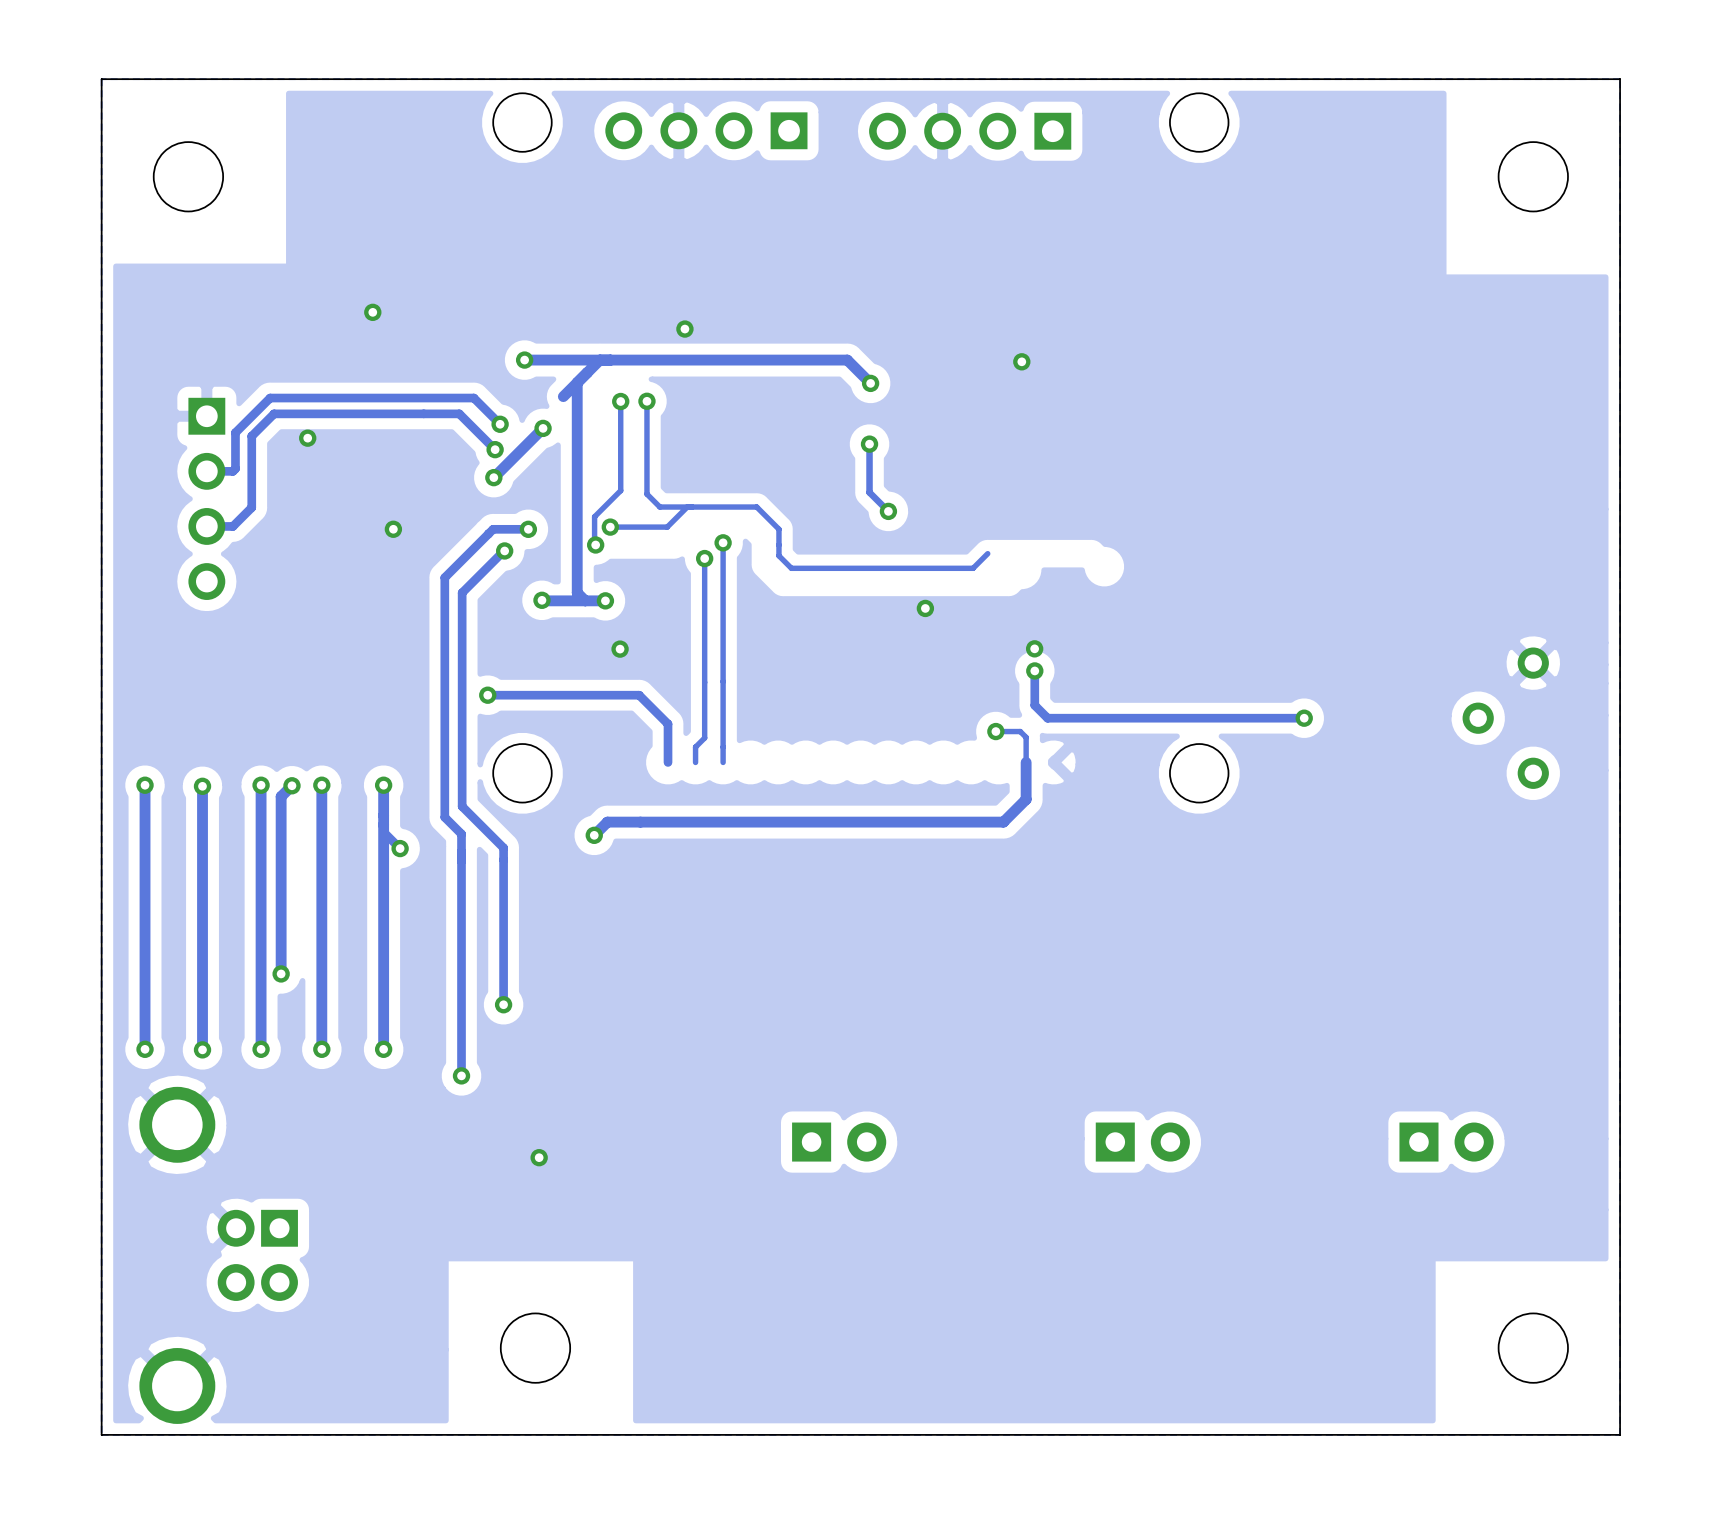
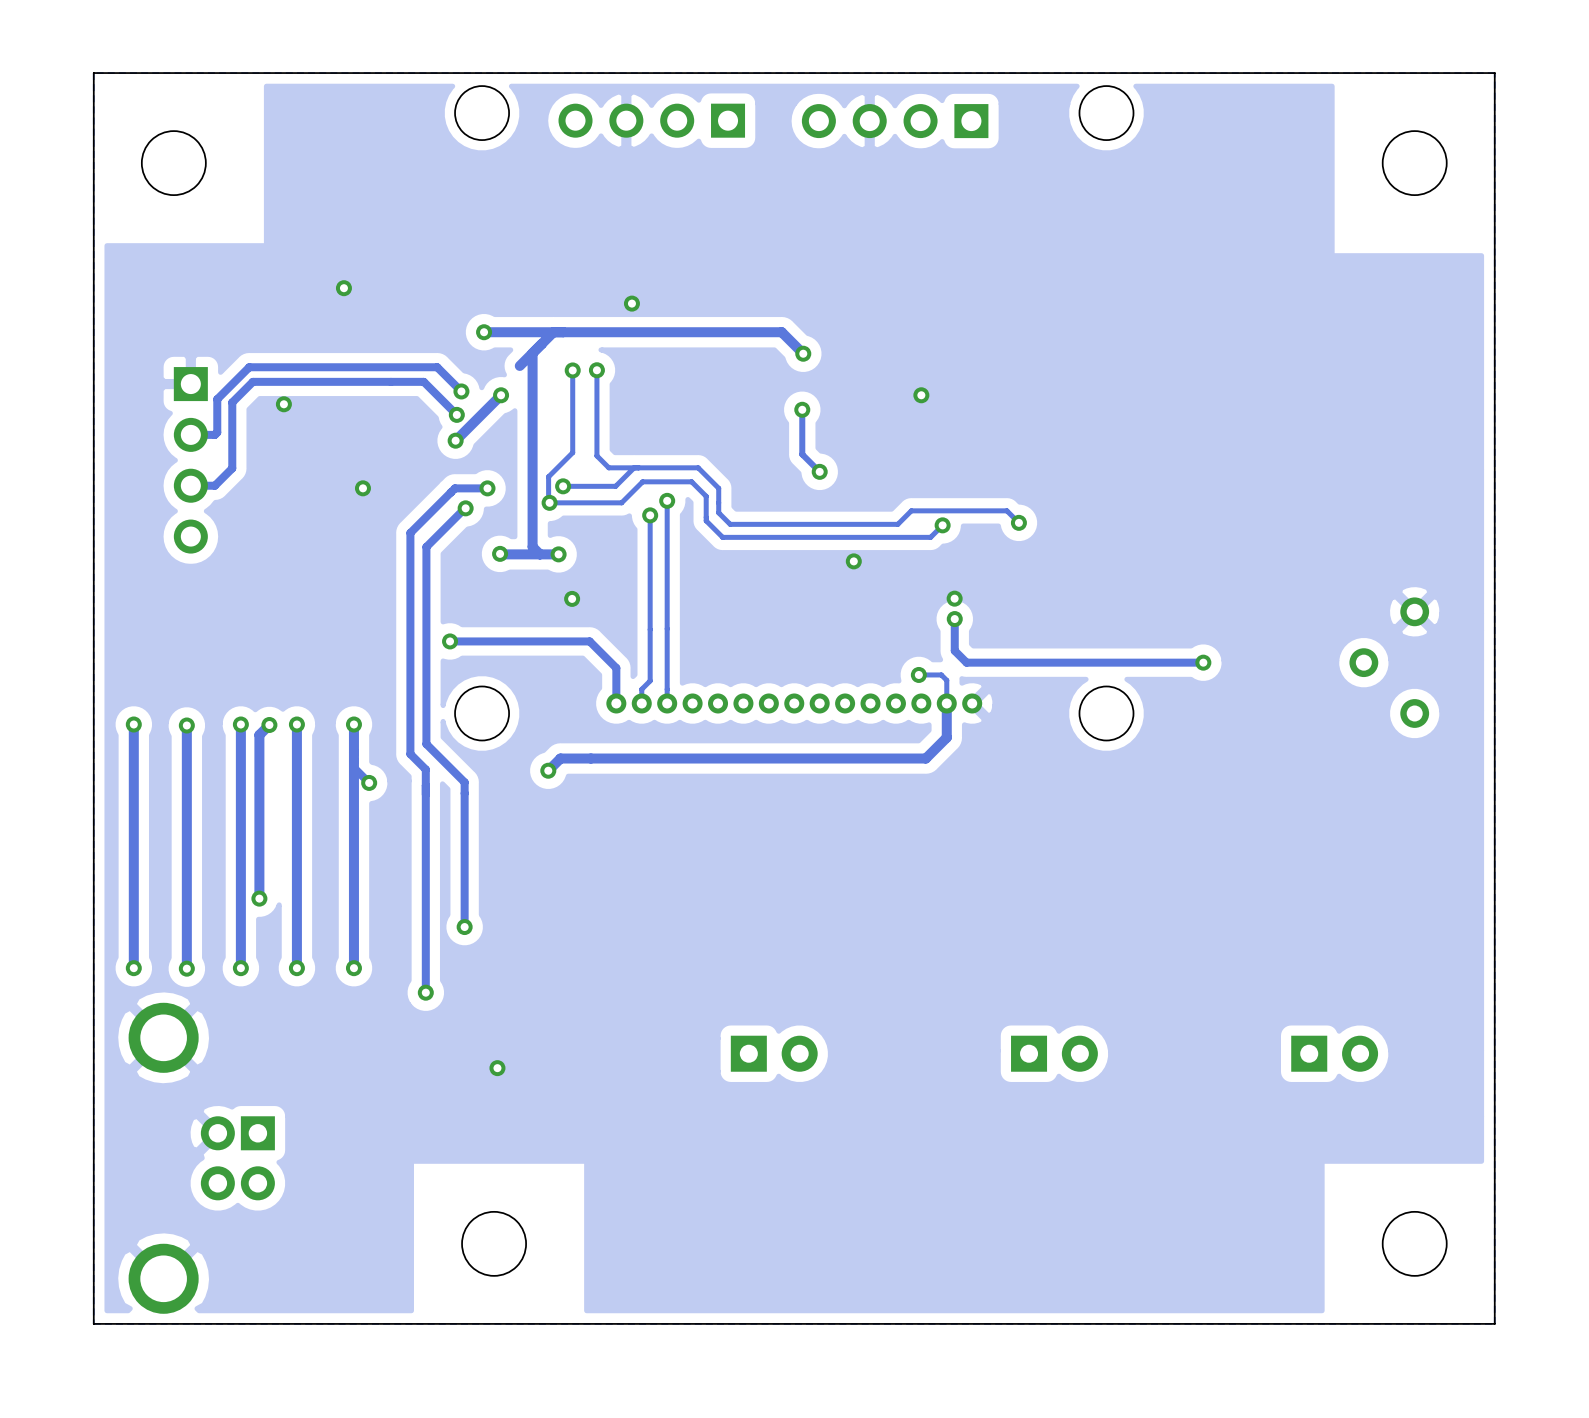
via position: (1021, 361) -> (921, 395)
track: none -> (549, 502) (621, 502) (642, 481) (691, 481) (706, 496) (706, 520) (722, 537) (930, 537) (942, 525)
track: none -> (911, 510) (1006, 510) (1018, 522)
via: none -> (1018, 522)
via: none -> (942, 525)
part: none -> (794, 703)

